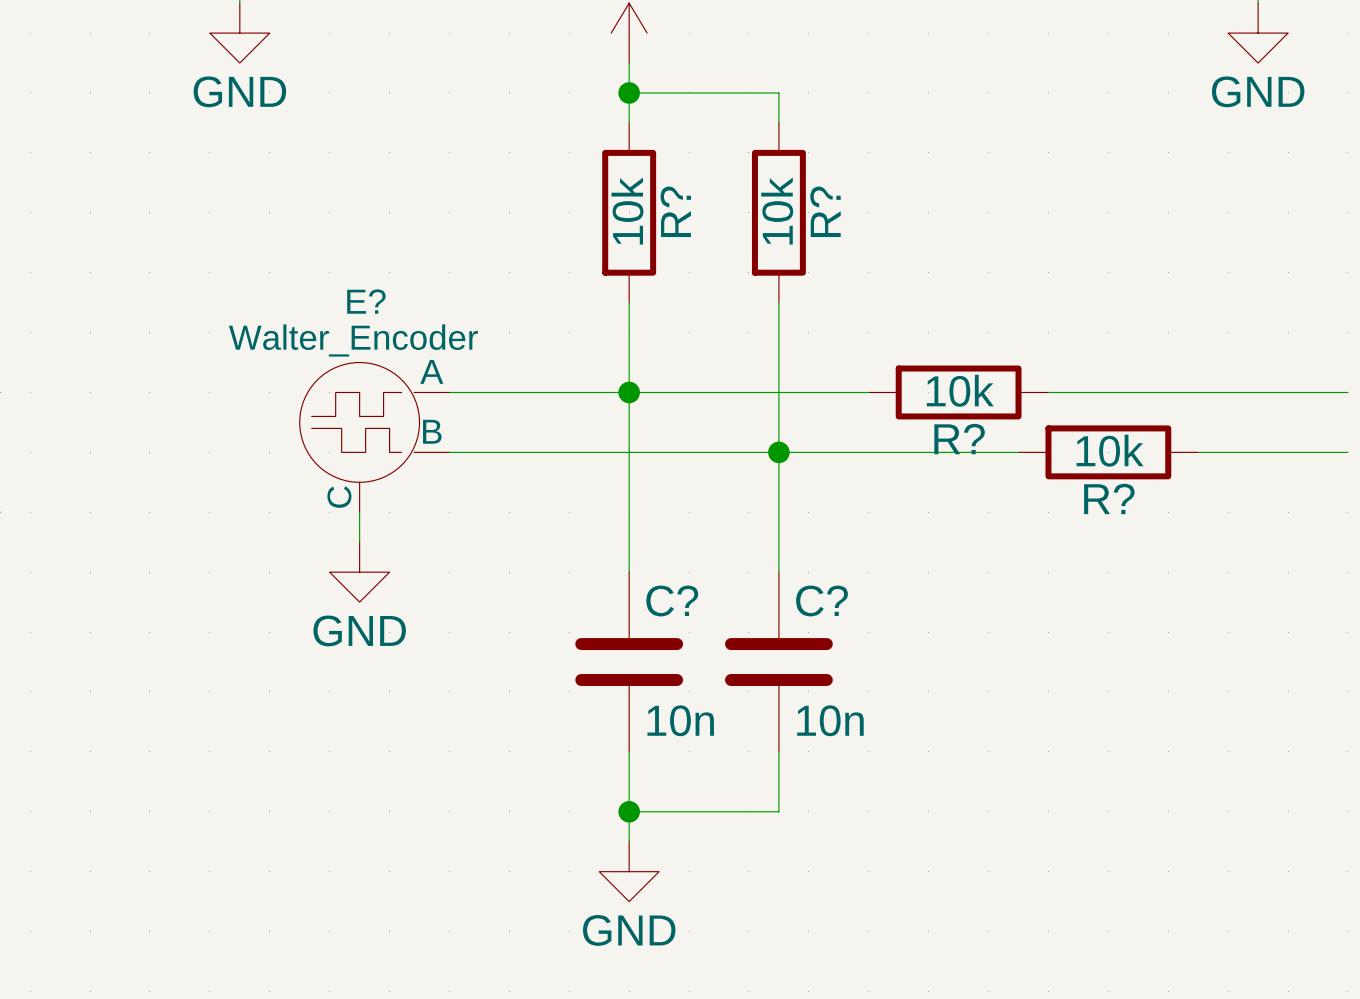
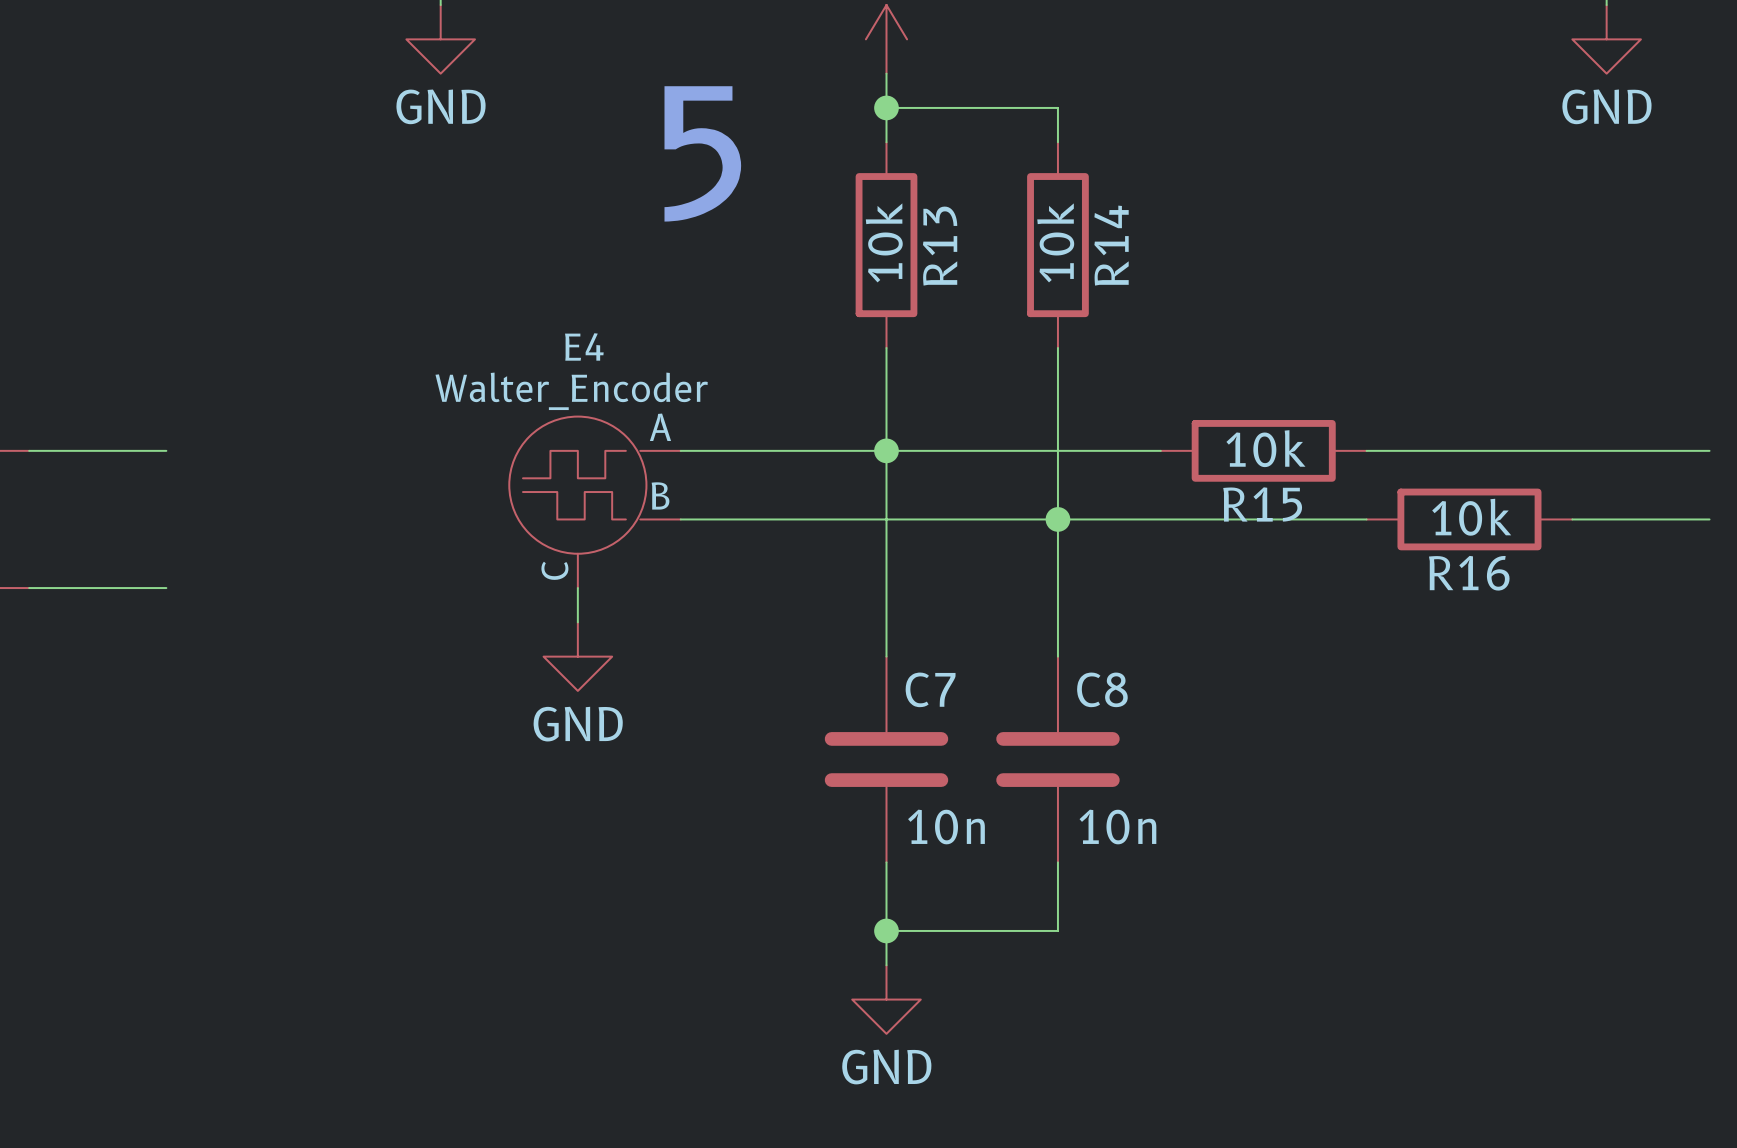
text: none -> 5 (702, 153)
R? name: R? (675, 211) -> R13 (940, 246)
R? name: R? (825, 211) -> R14 (1111, 245)
E? name: E? (366, 301) -> E4 (584, 346)
R? name: R? (959, 439) -> R15 (1262, 504)
R?: 10k (1108, 452) -> none
R16: none -> 10k (1469, 519)
C? name: C? (672, 600) -> C7 (930, 689)
C? name: C? (822, 600) -> C8 (1102, 689)

